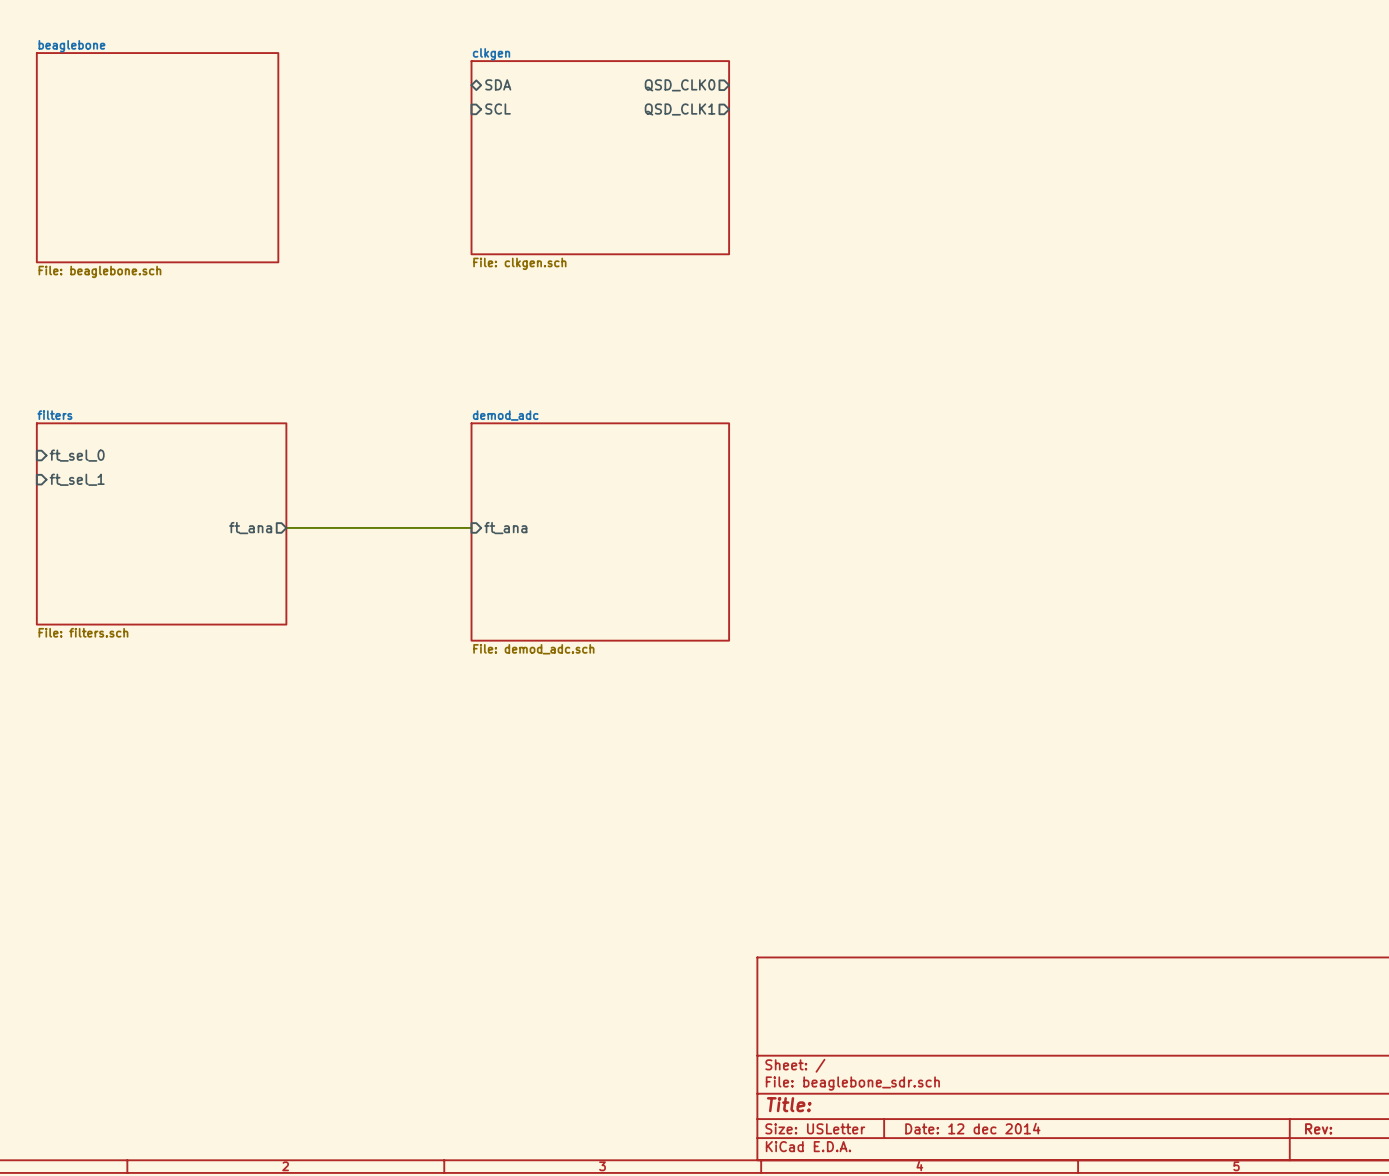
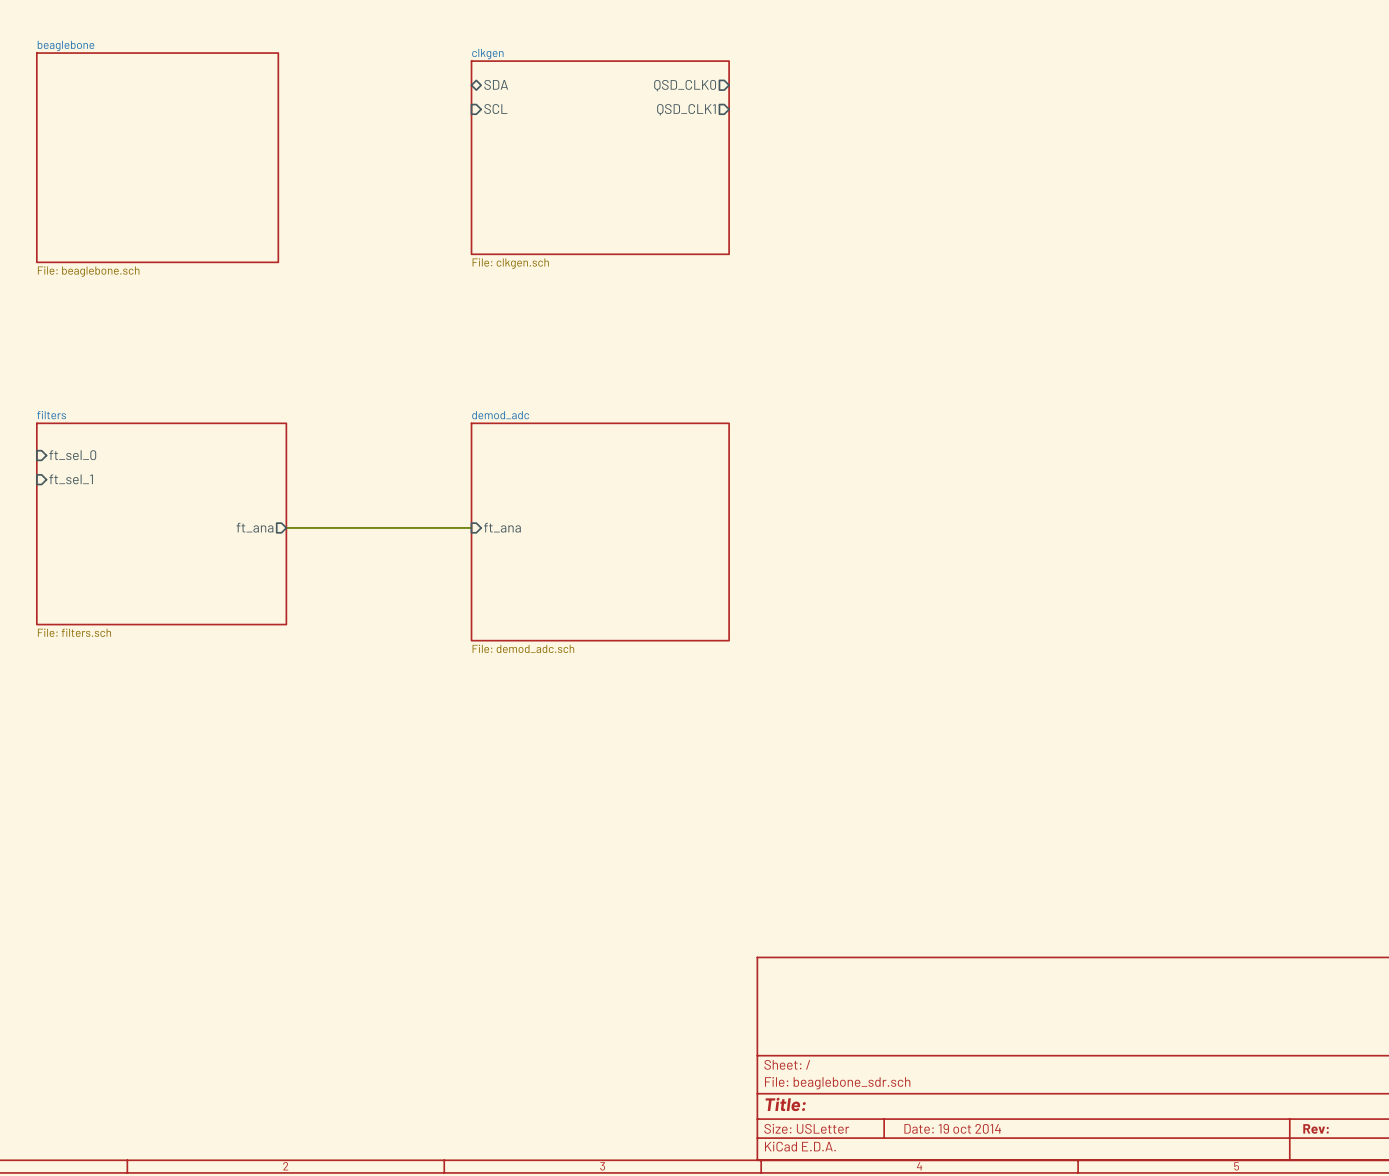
title block: Date: 12 dec 2014 (972, 1128) -> Date: 19 oct 2014 (952, 1128)

